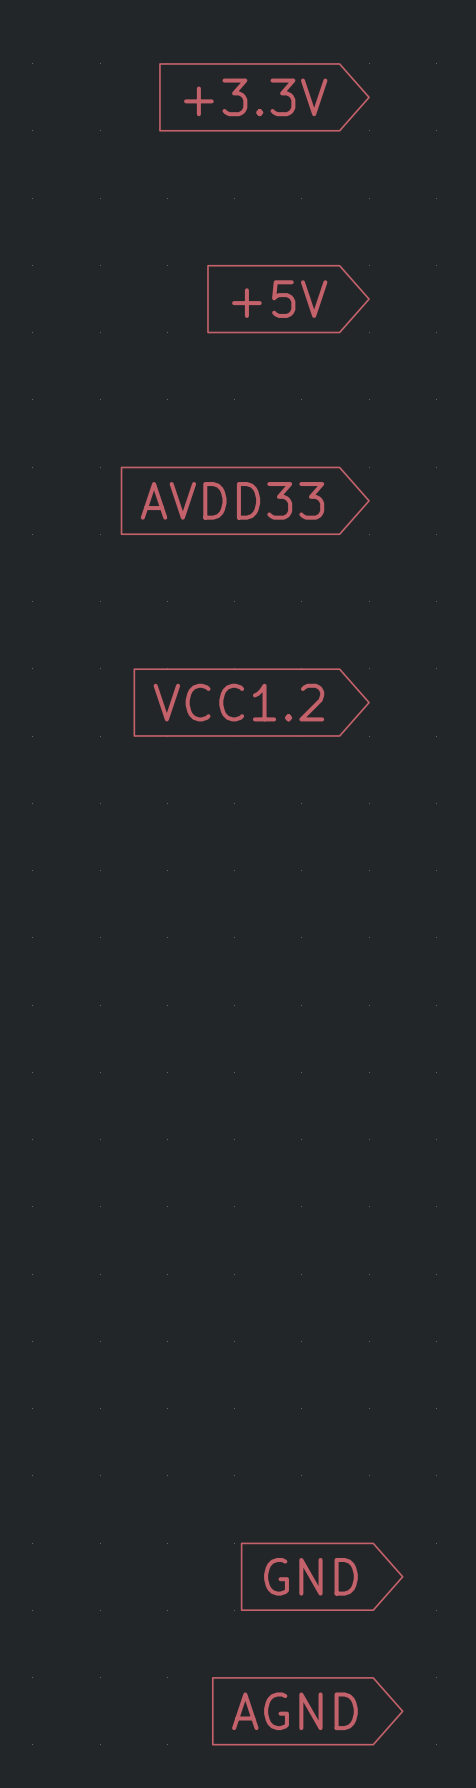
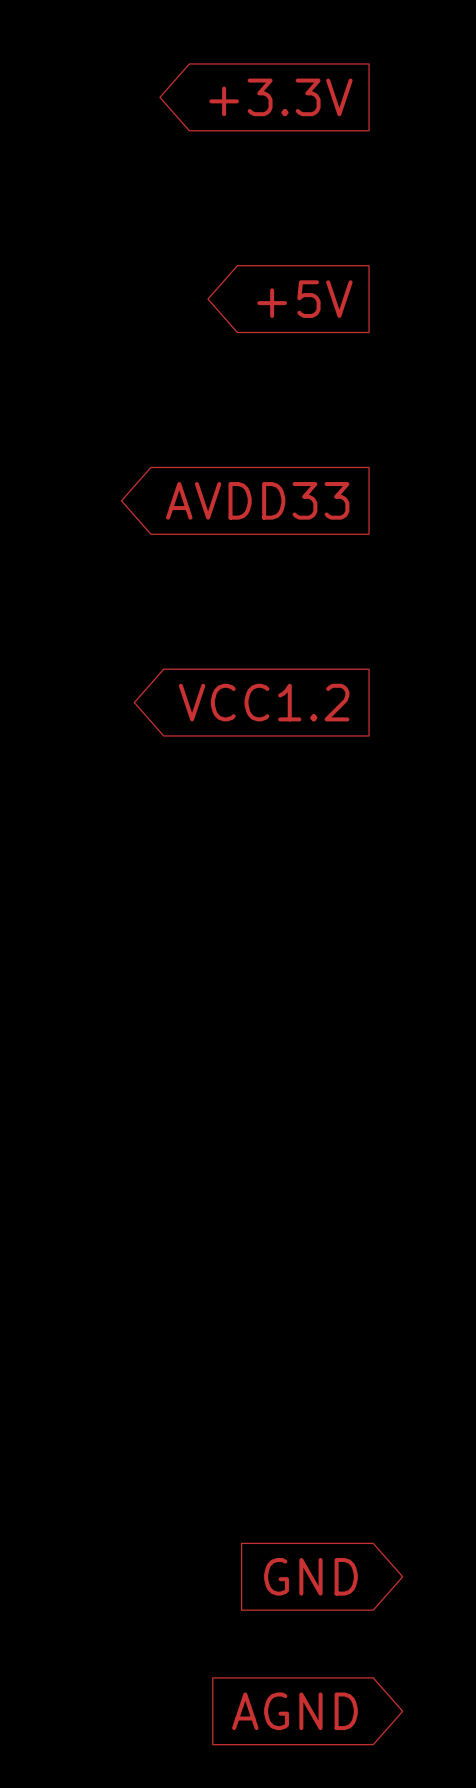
global label shape: input (255, 97) -> output (280, 97)
global label shape: input (279, 299) -> output (304, 299)
global label shape: input (232, 500) -> output (257, 500)
global label shape: input (238, 702) -> output (264, 702)

